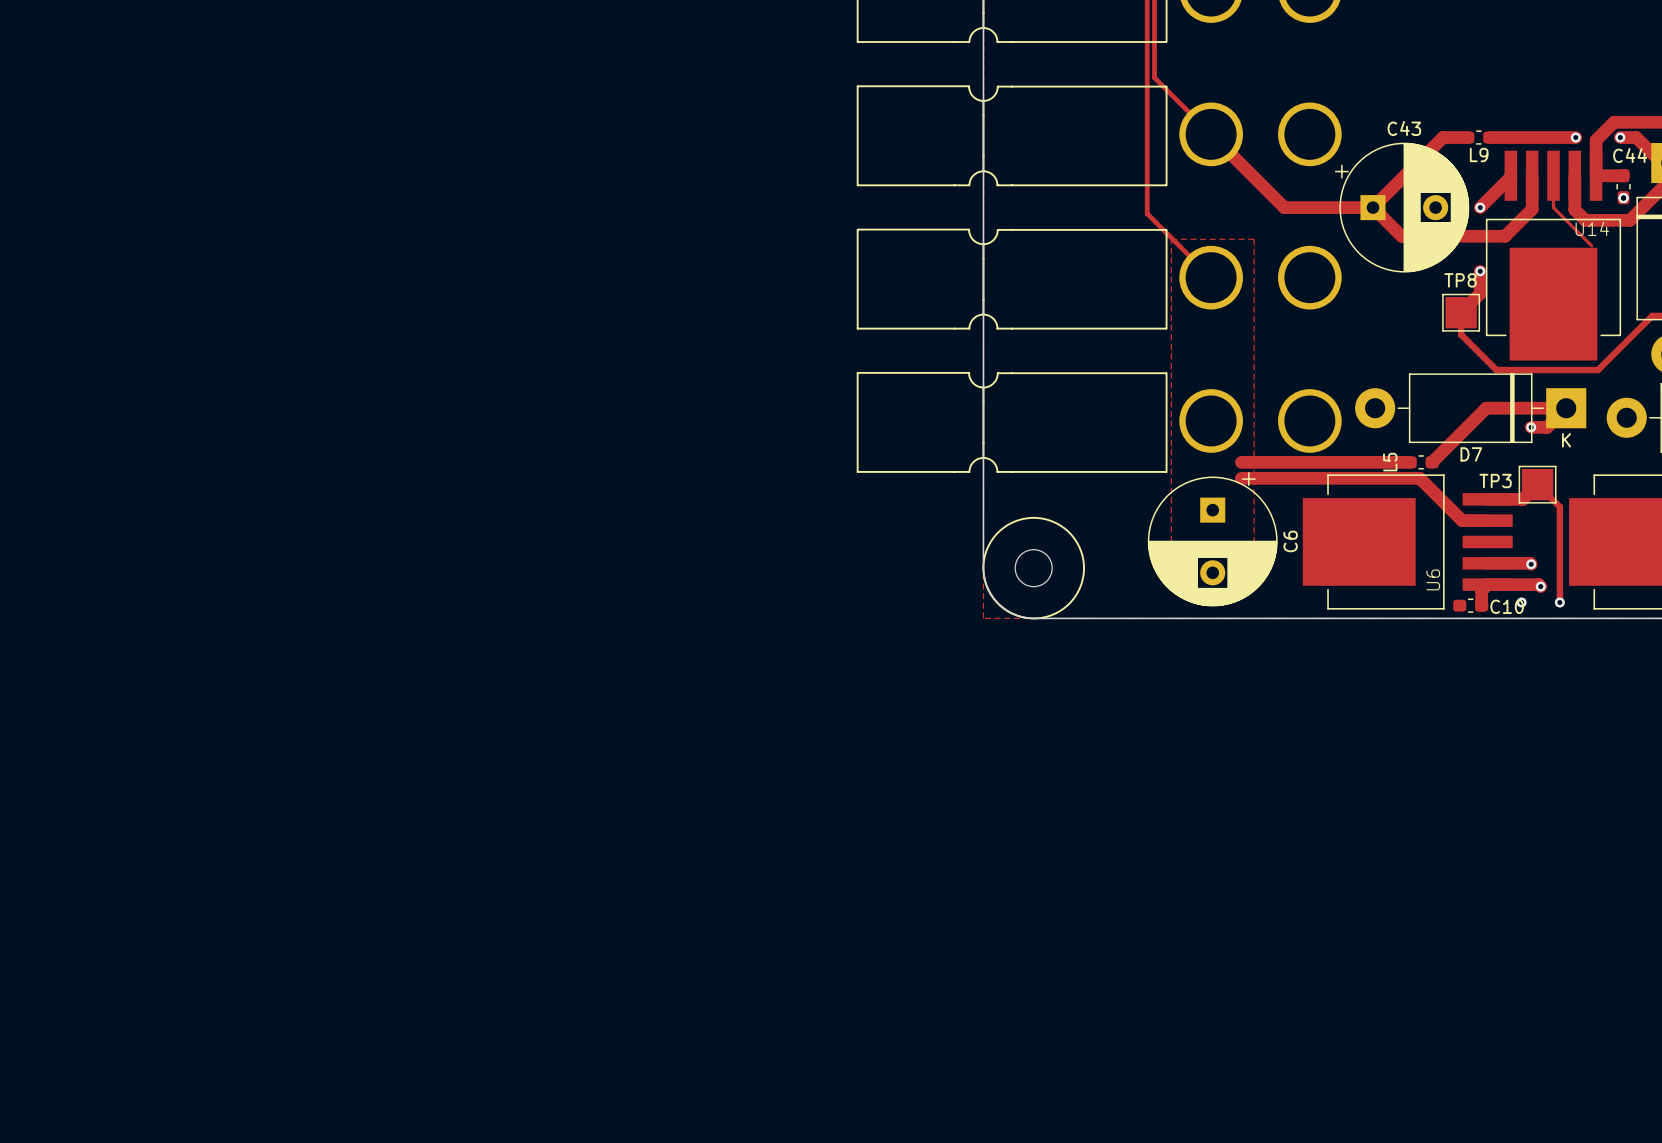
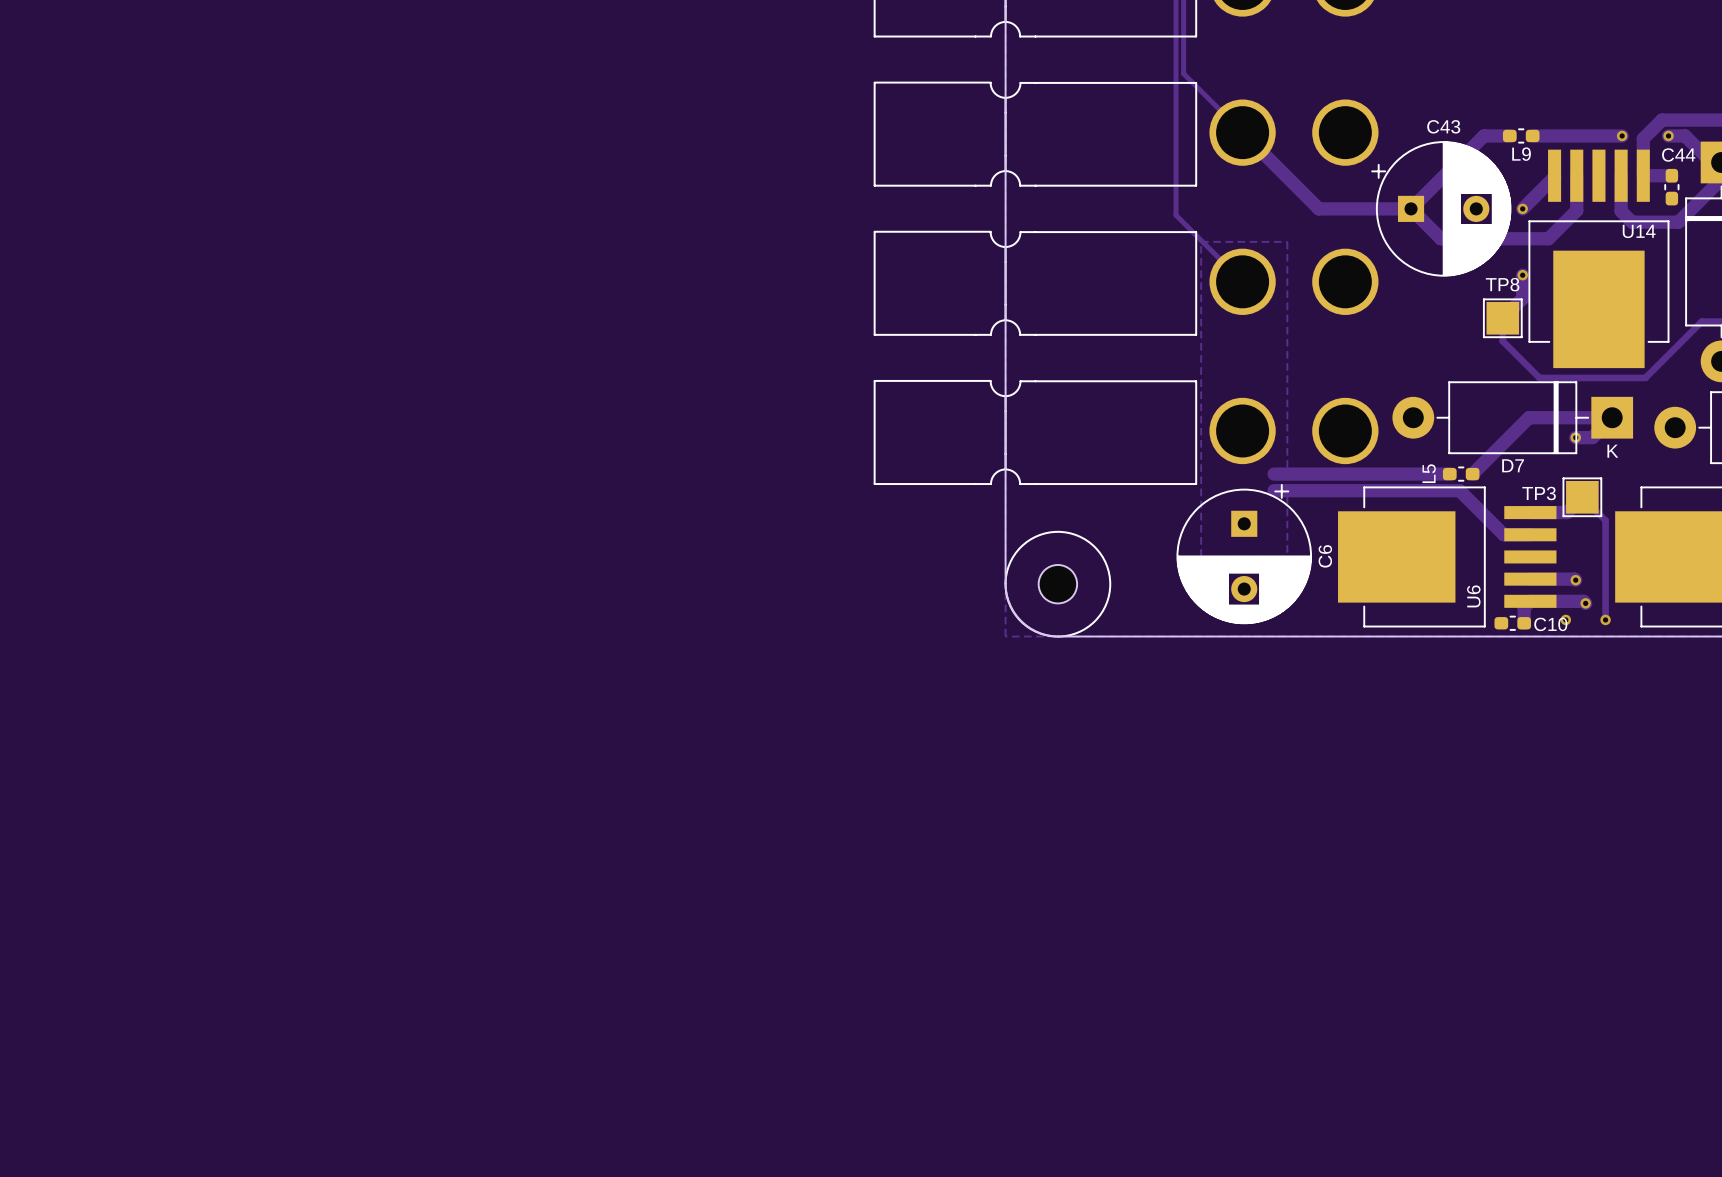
track: (1553, 175) (1553, 207) (1591, 245) -> none
via: (1623, 198) -> none

